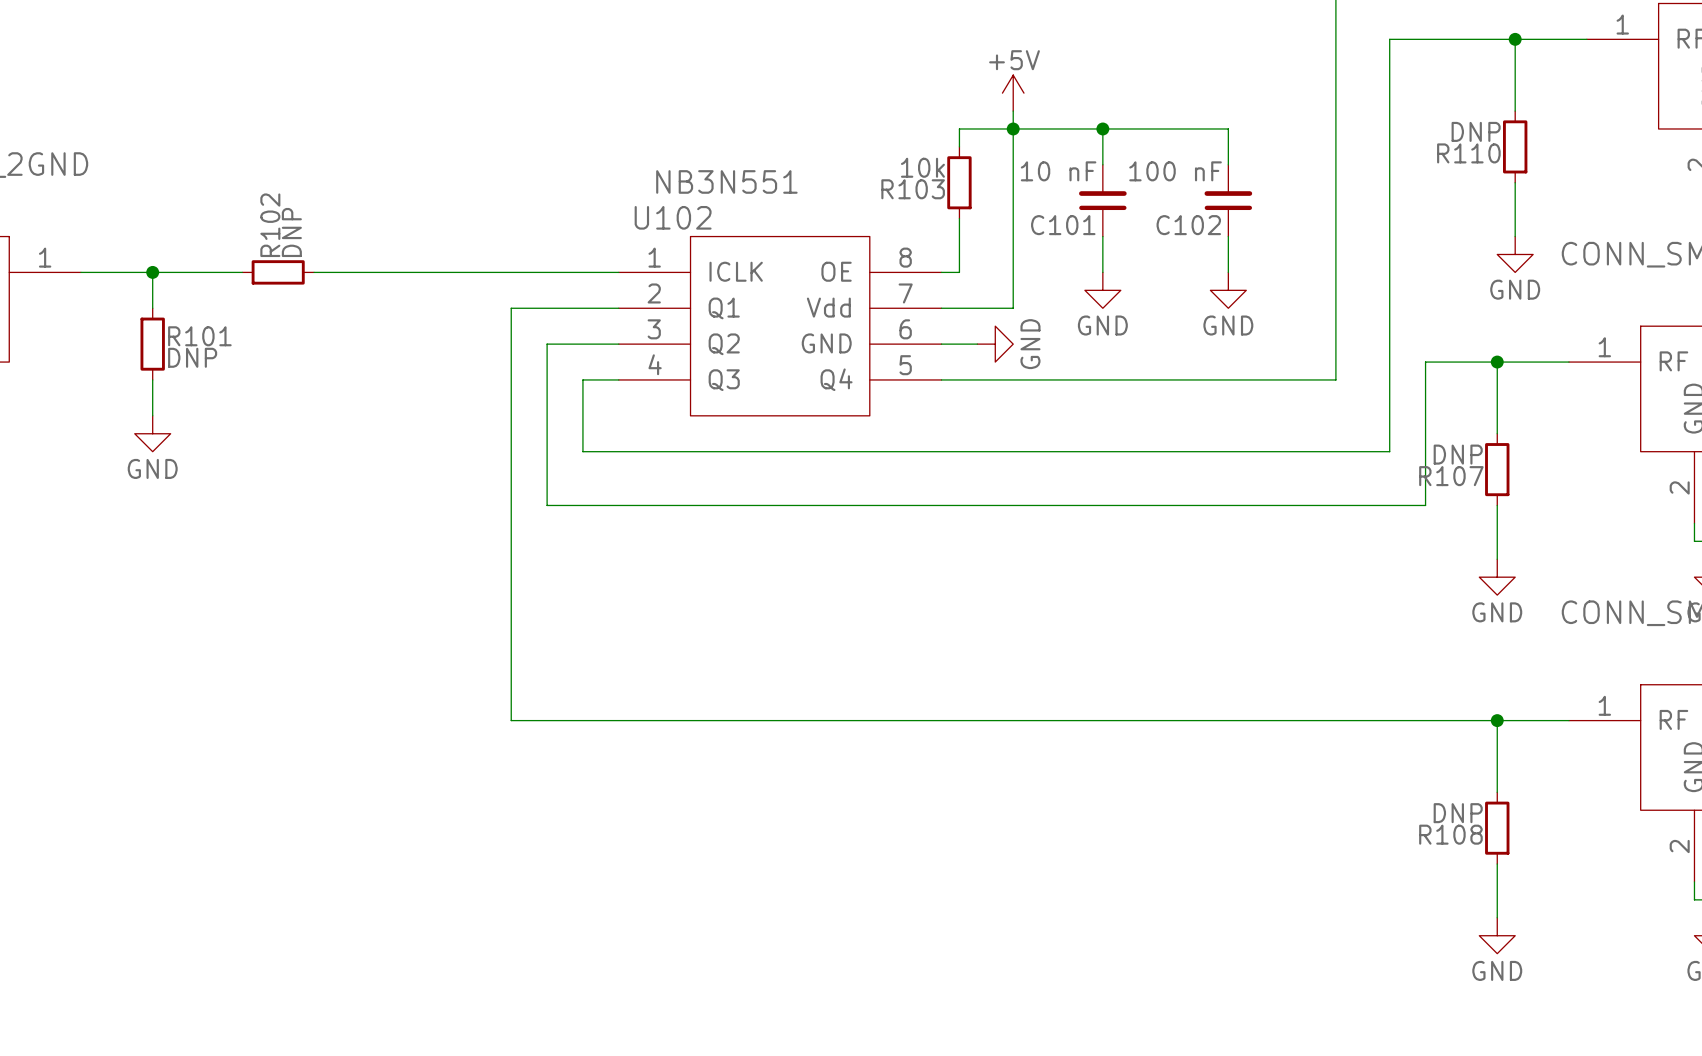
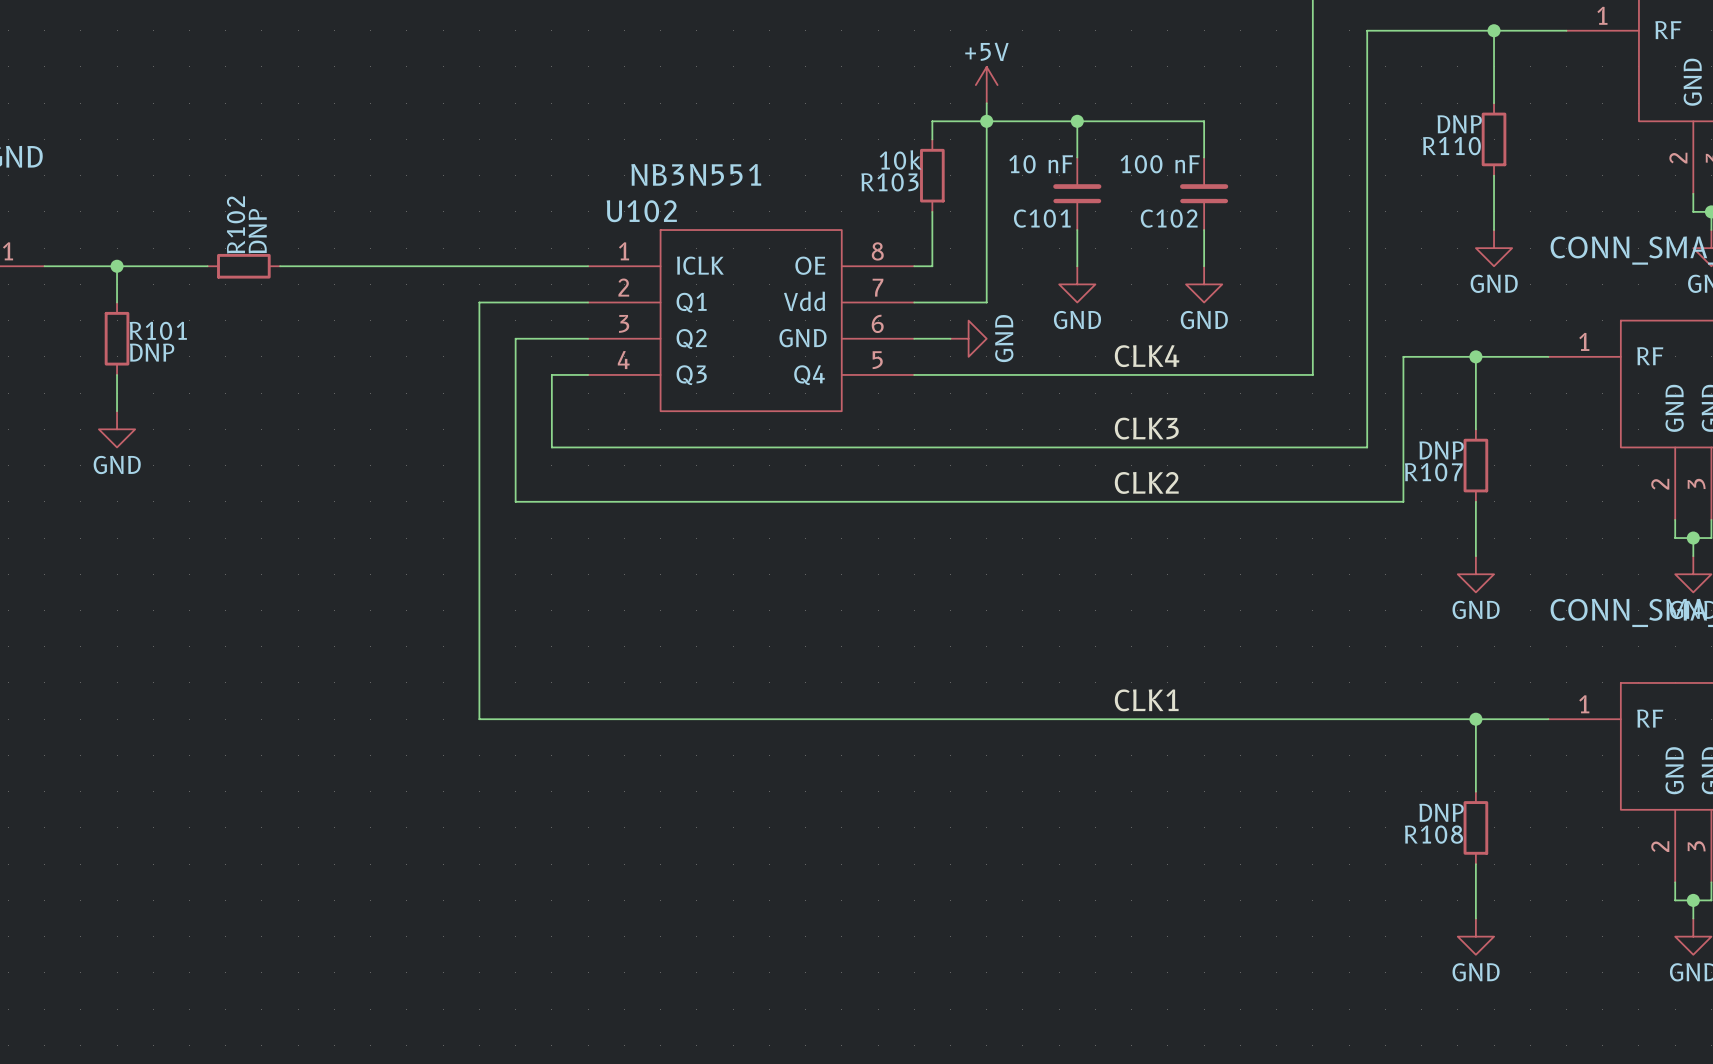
label: none -> CLK4 (1147, 356)
label: none -> CLK3 (1146, 428)
label: none -> CLK2 (1146, 482)
label: none -> CLK1 (1146, 700)

